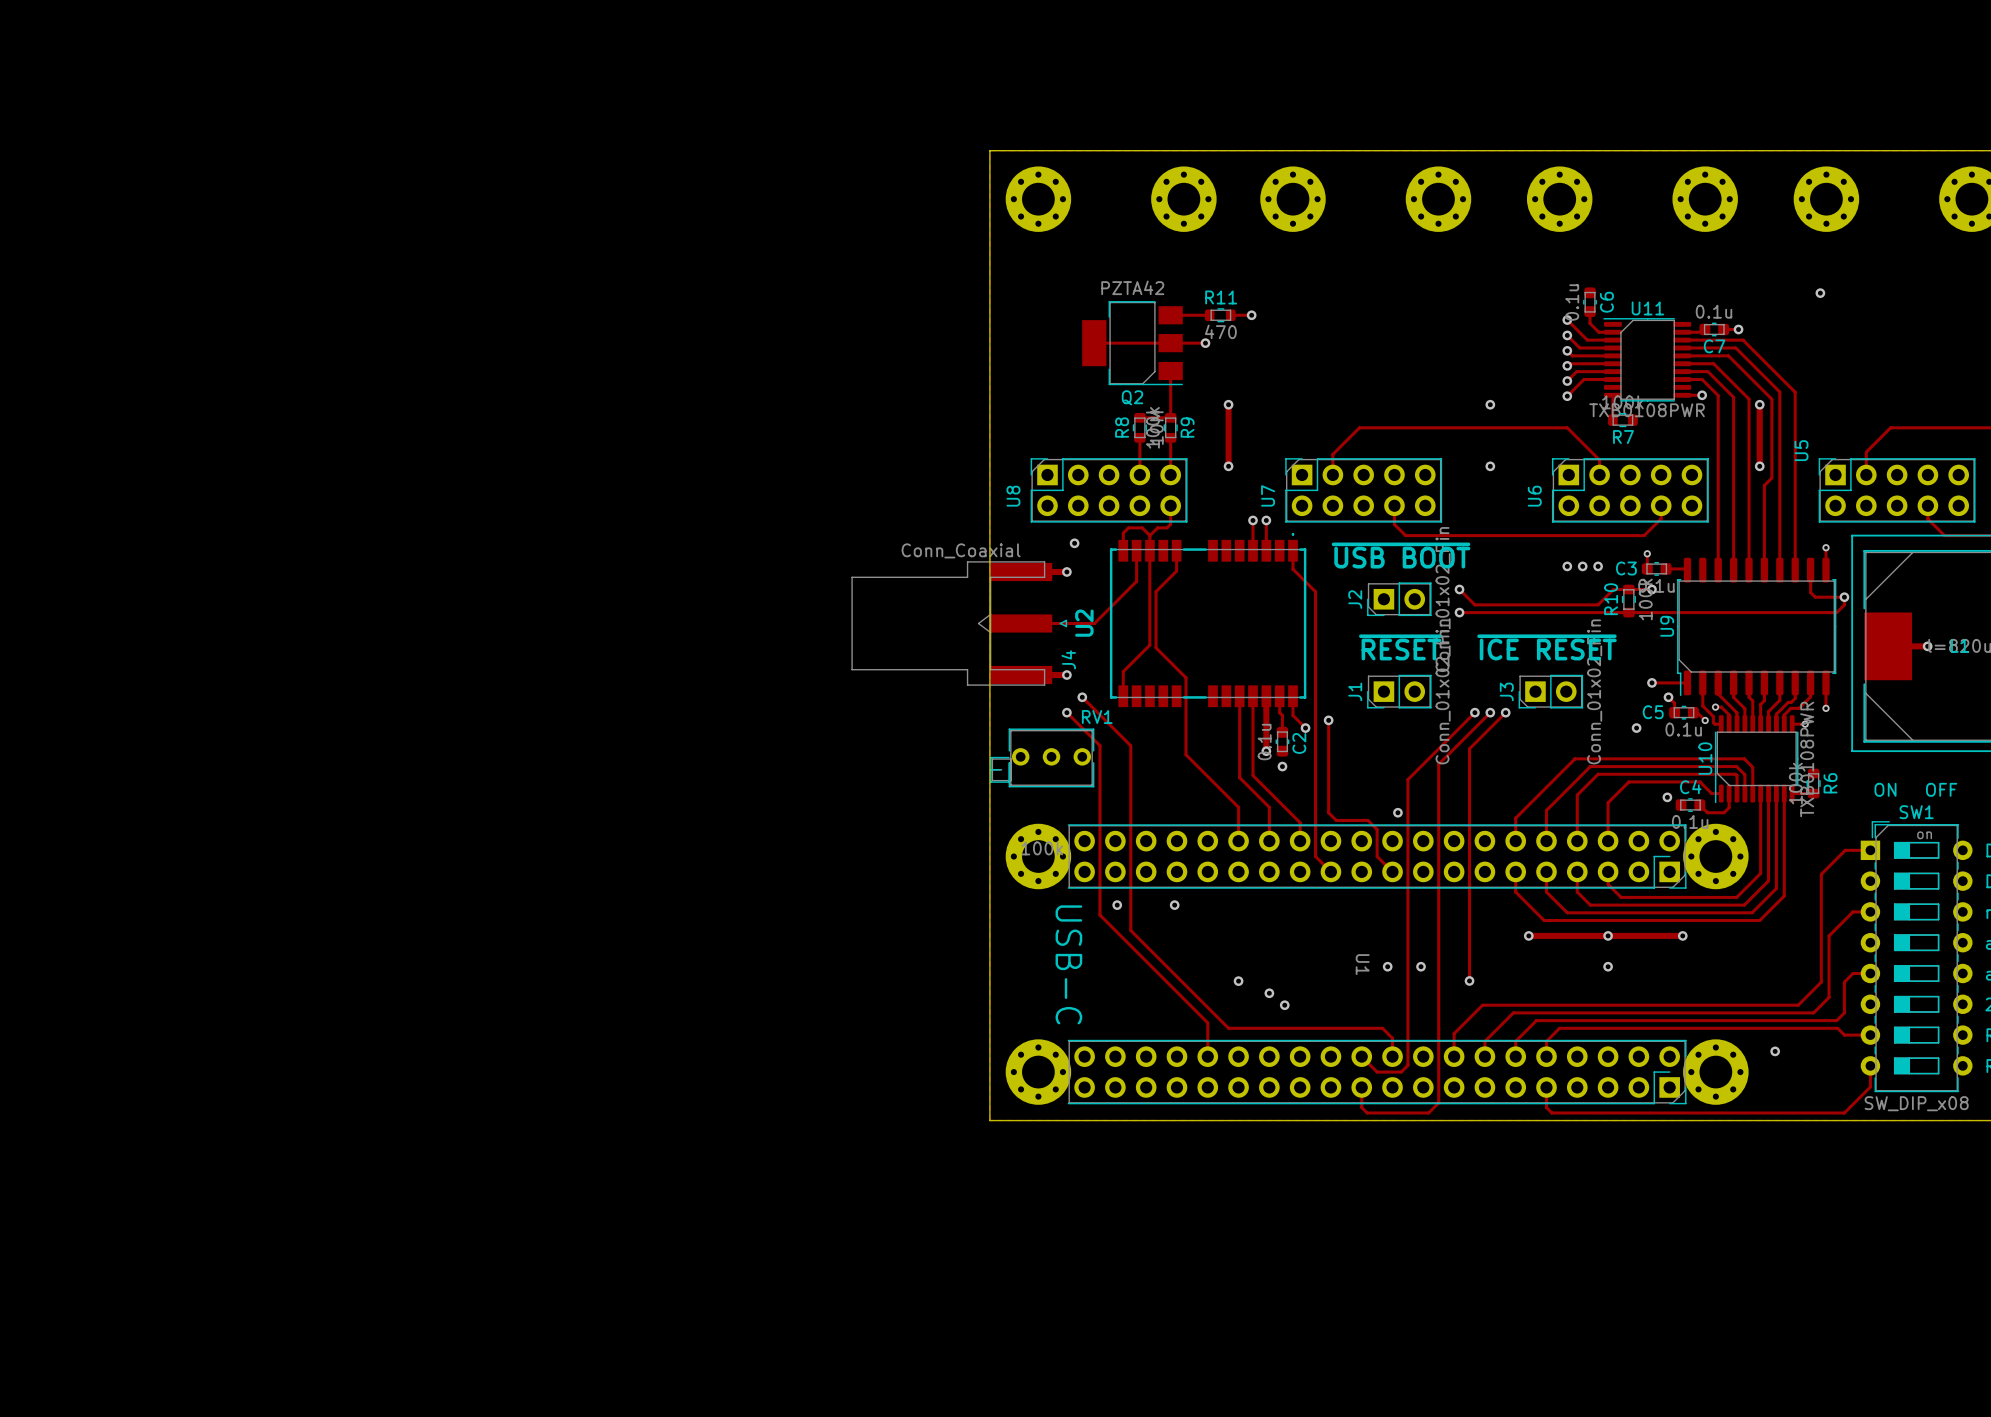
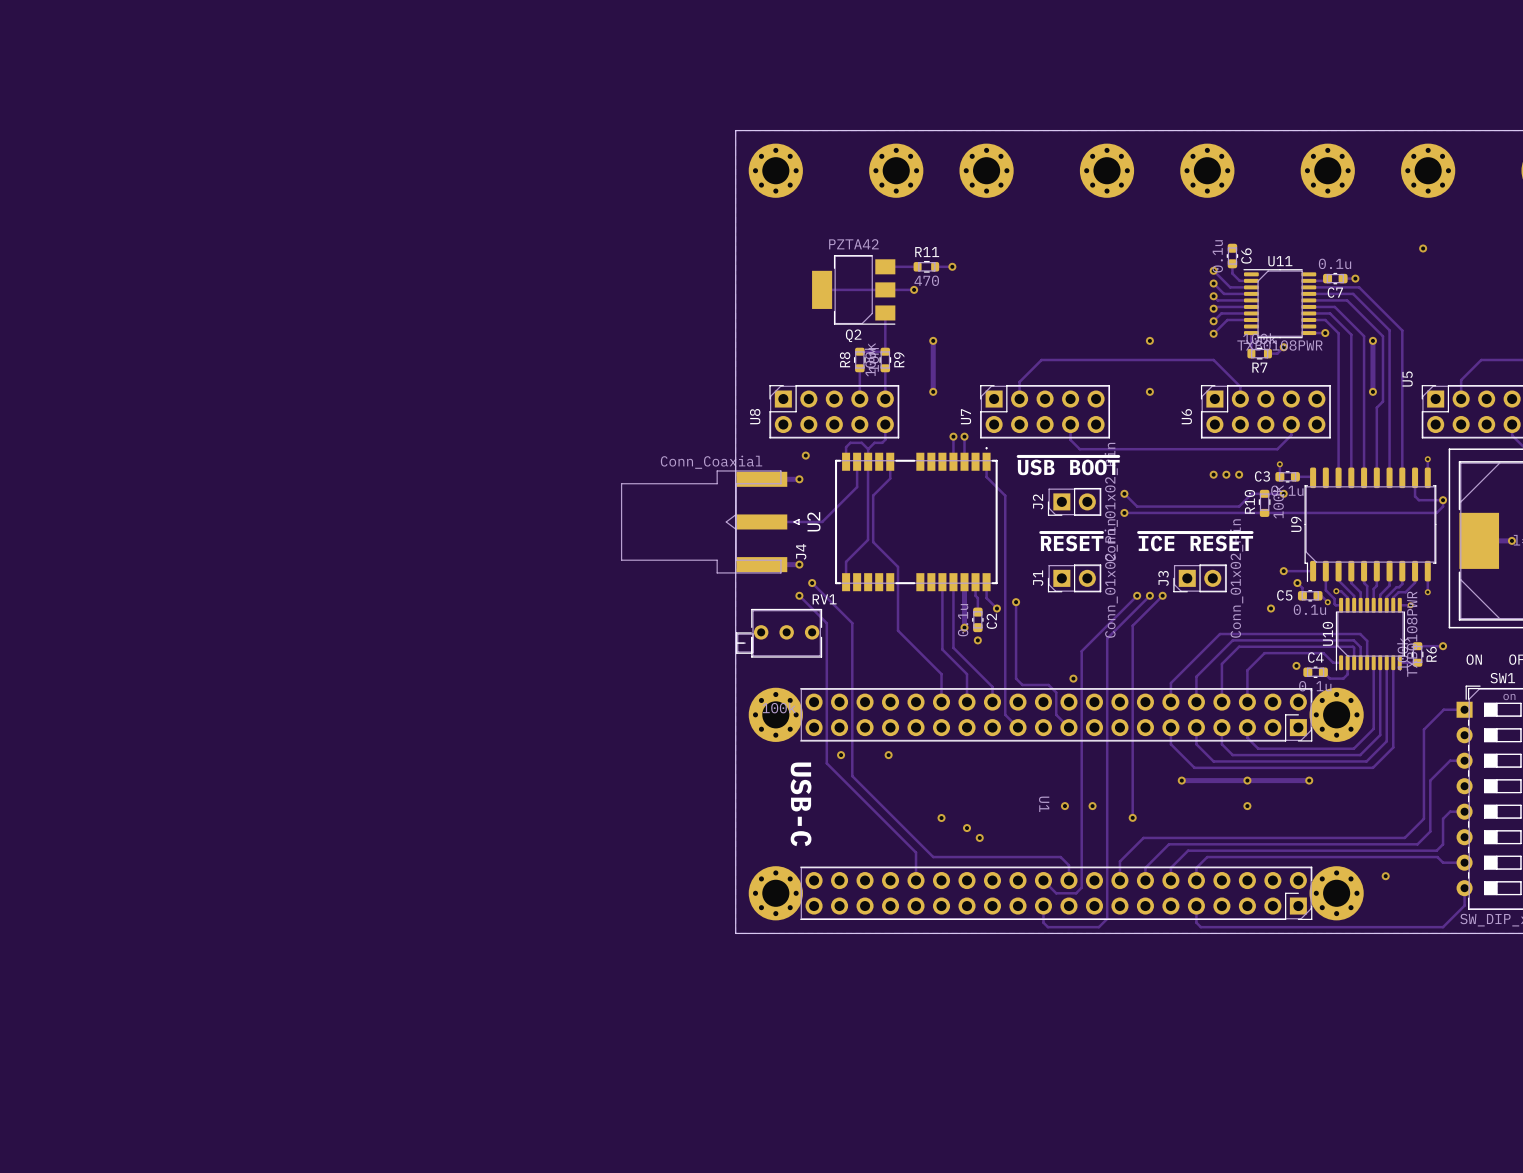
track: none -> (1283, 347) (1277, 353) (1267, 353)
via: none -> (1283, 347)
track: none -> (1417, 646) (1443, 646)
via: none -> (1443, 646)

